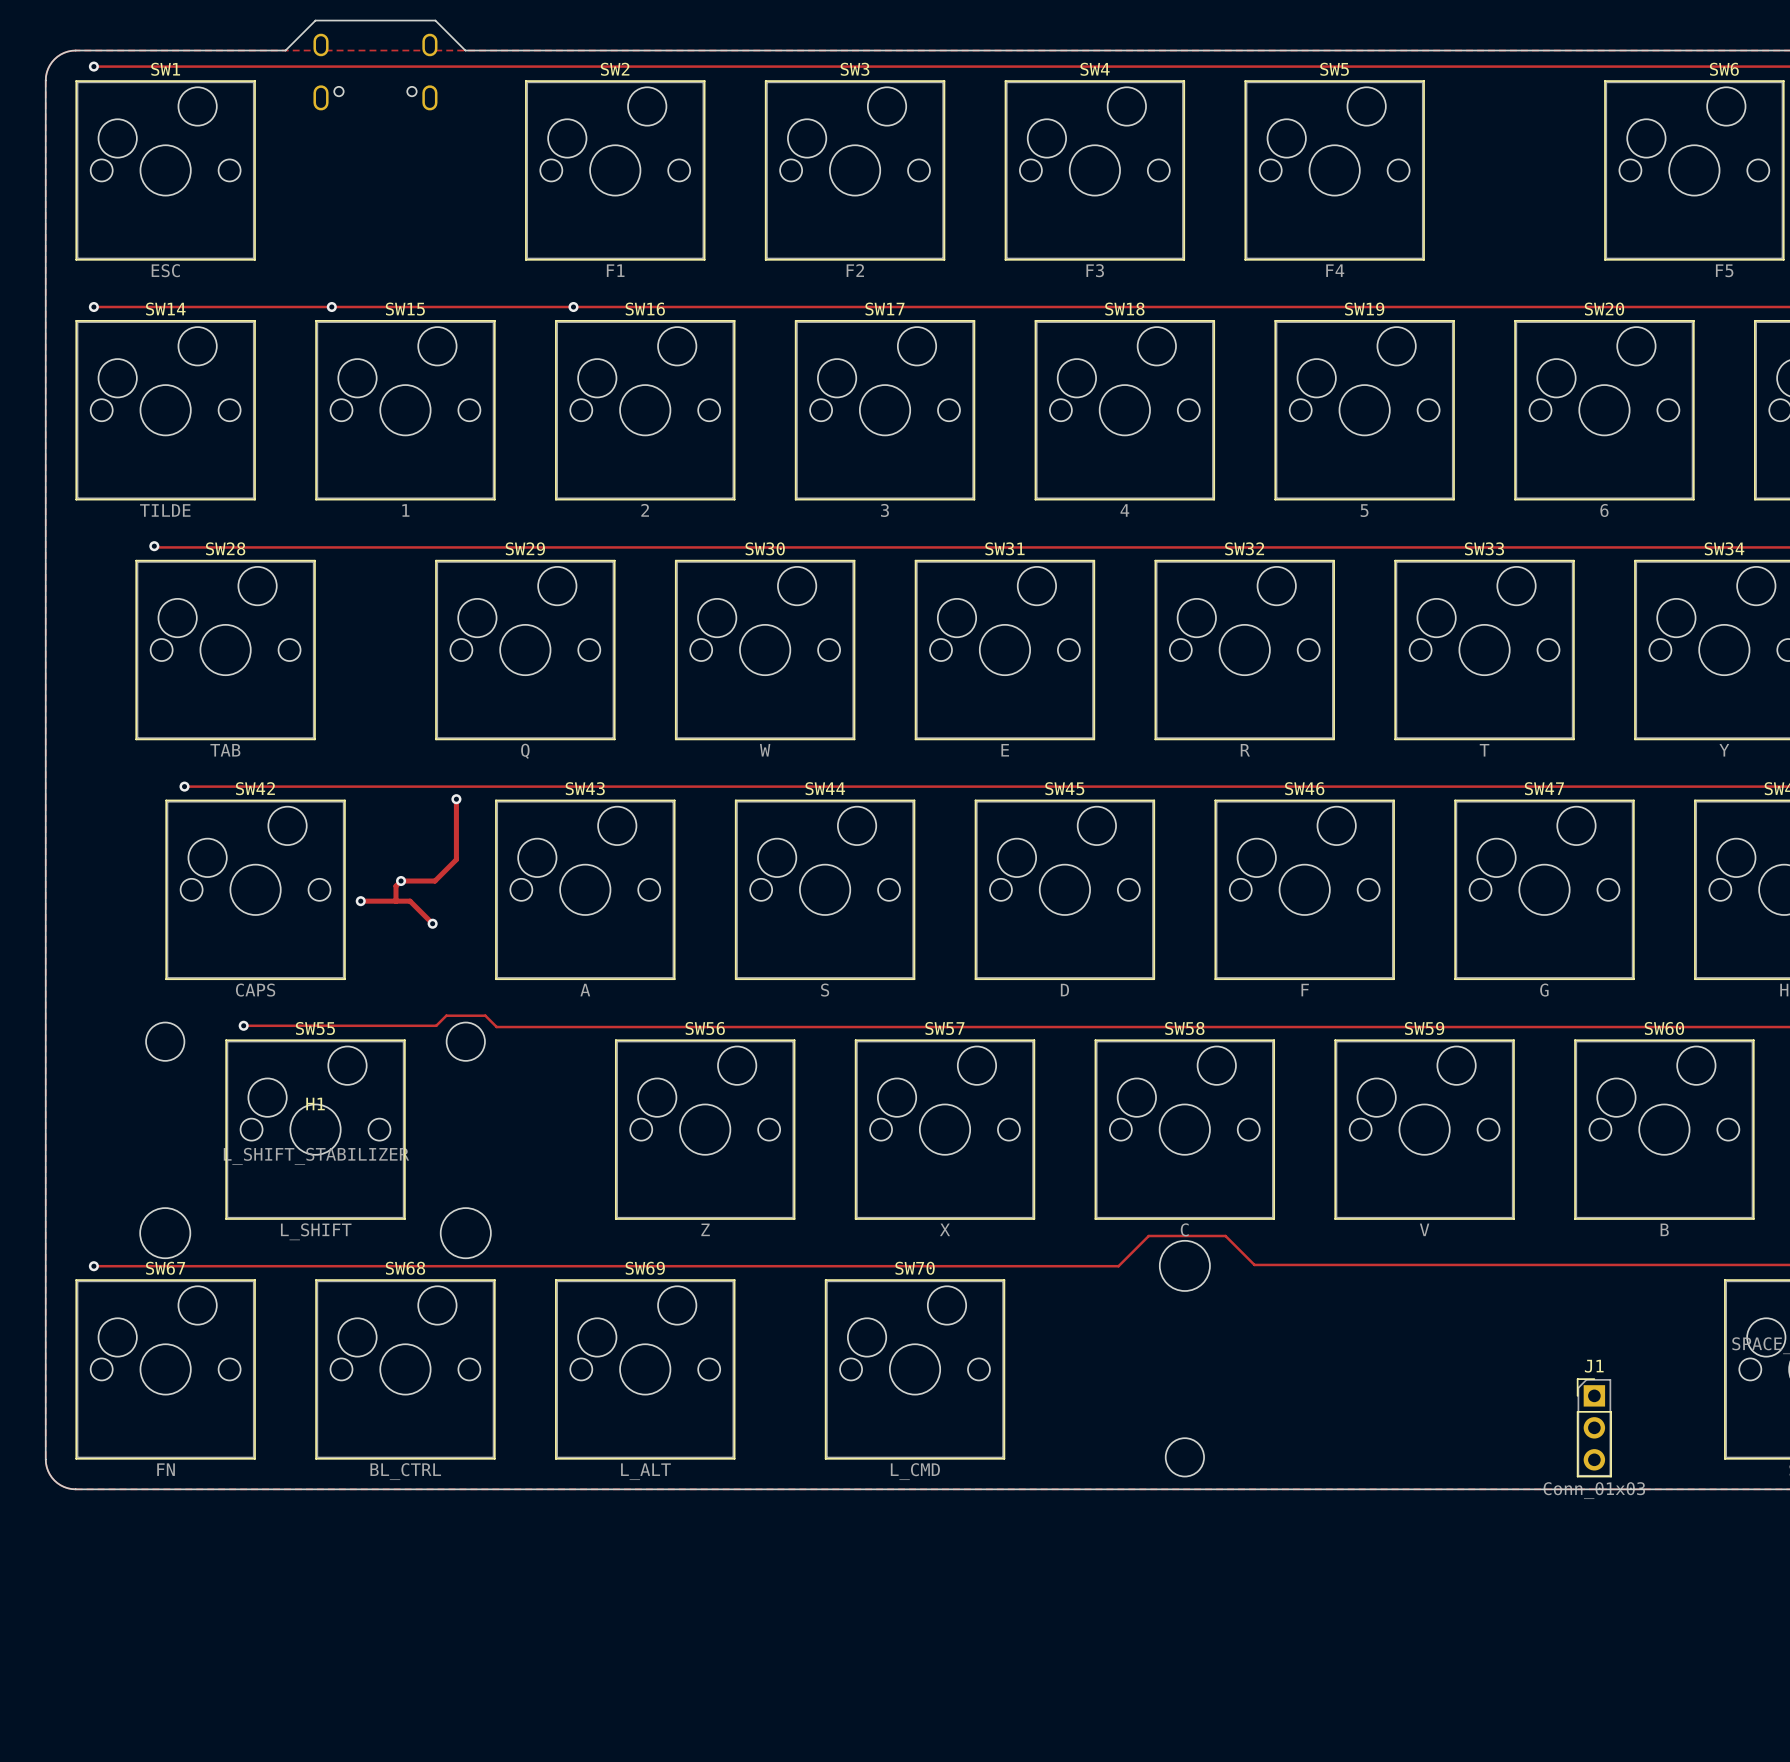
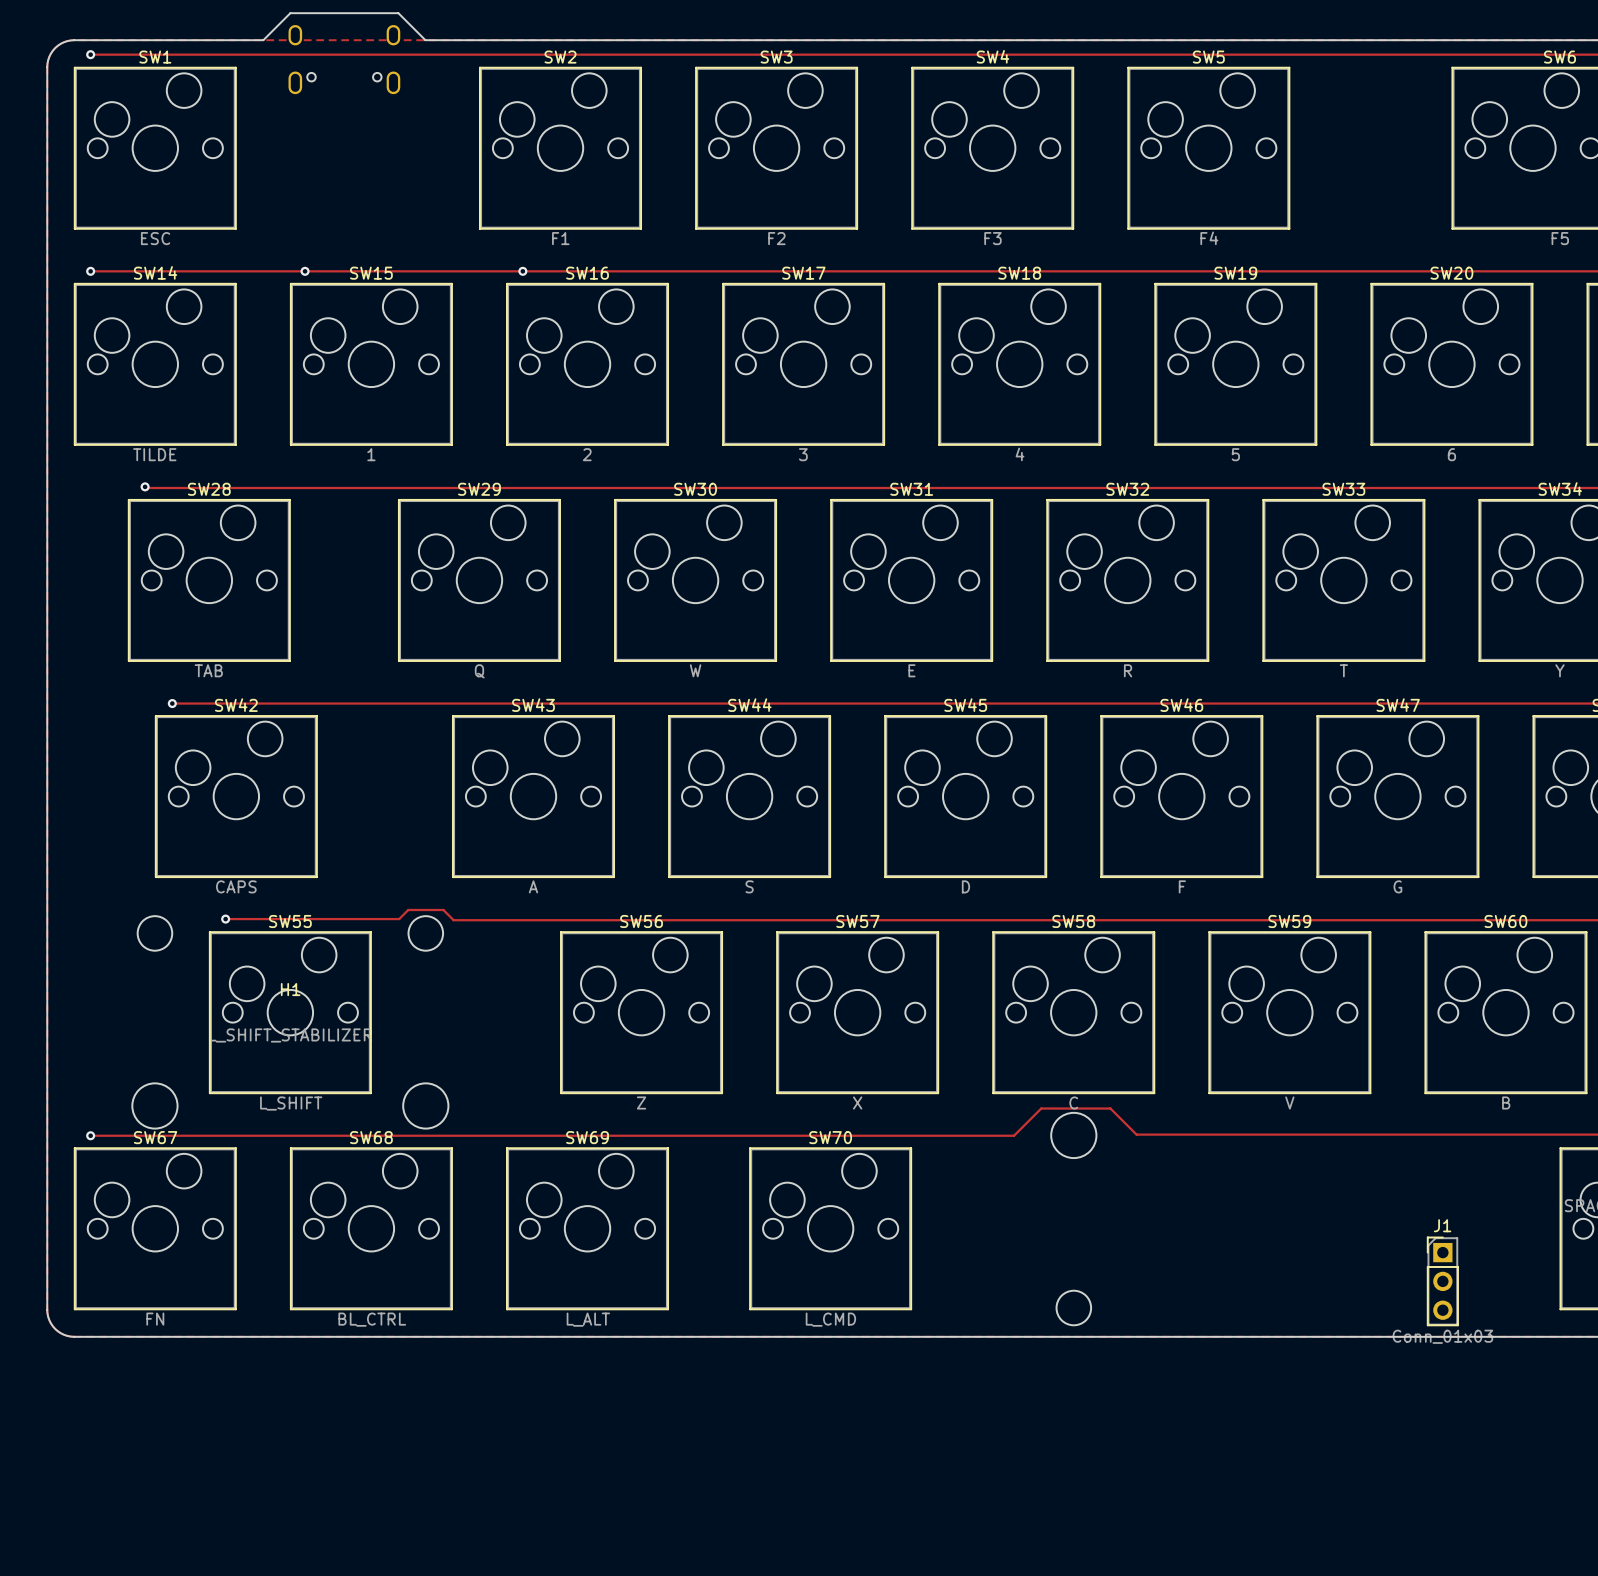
track: (456, 799) (456, 859) (435, 881) (401, 881) (396, 886) (396, 901) -> none
via: (456, 799) -> none
via: (401, 881) -> none
track: (360, 901) (410, 901) (432, 923) -> none
via: (360, 901) -> none
via: (432, 923) -> none

